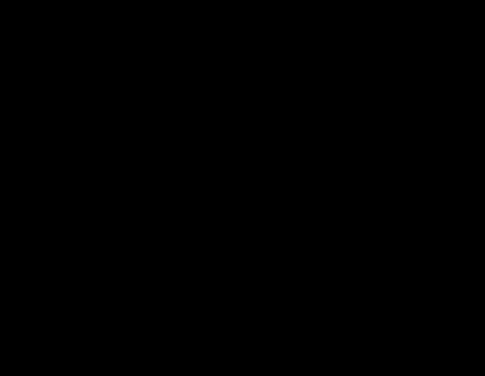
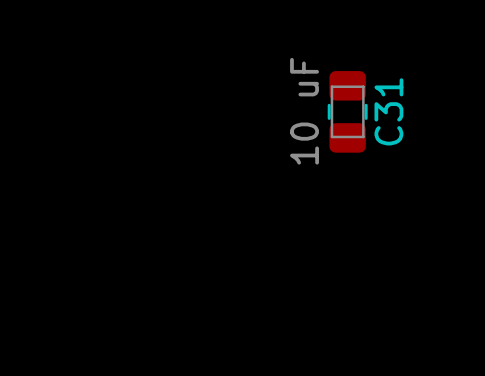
C31: none -> 10 uF (347, 111)

